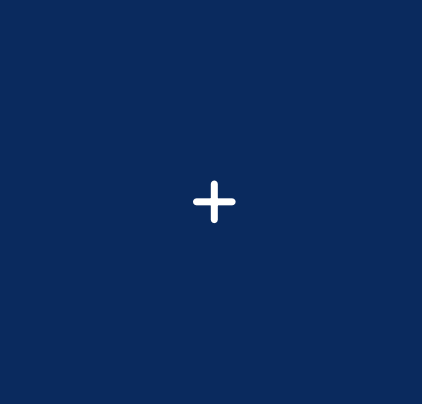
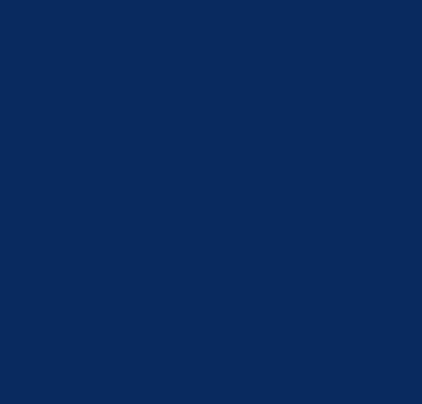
text: + (214, 201) -> none

